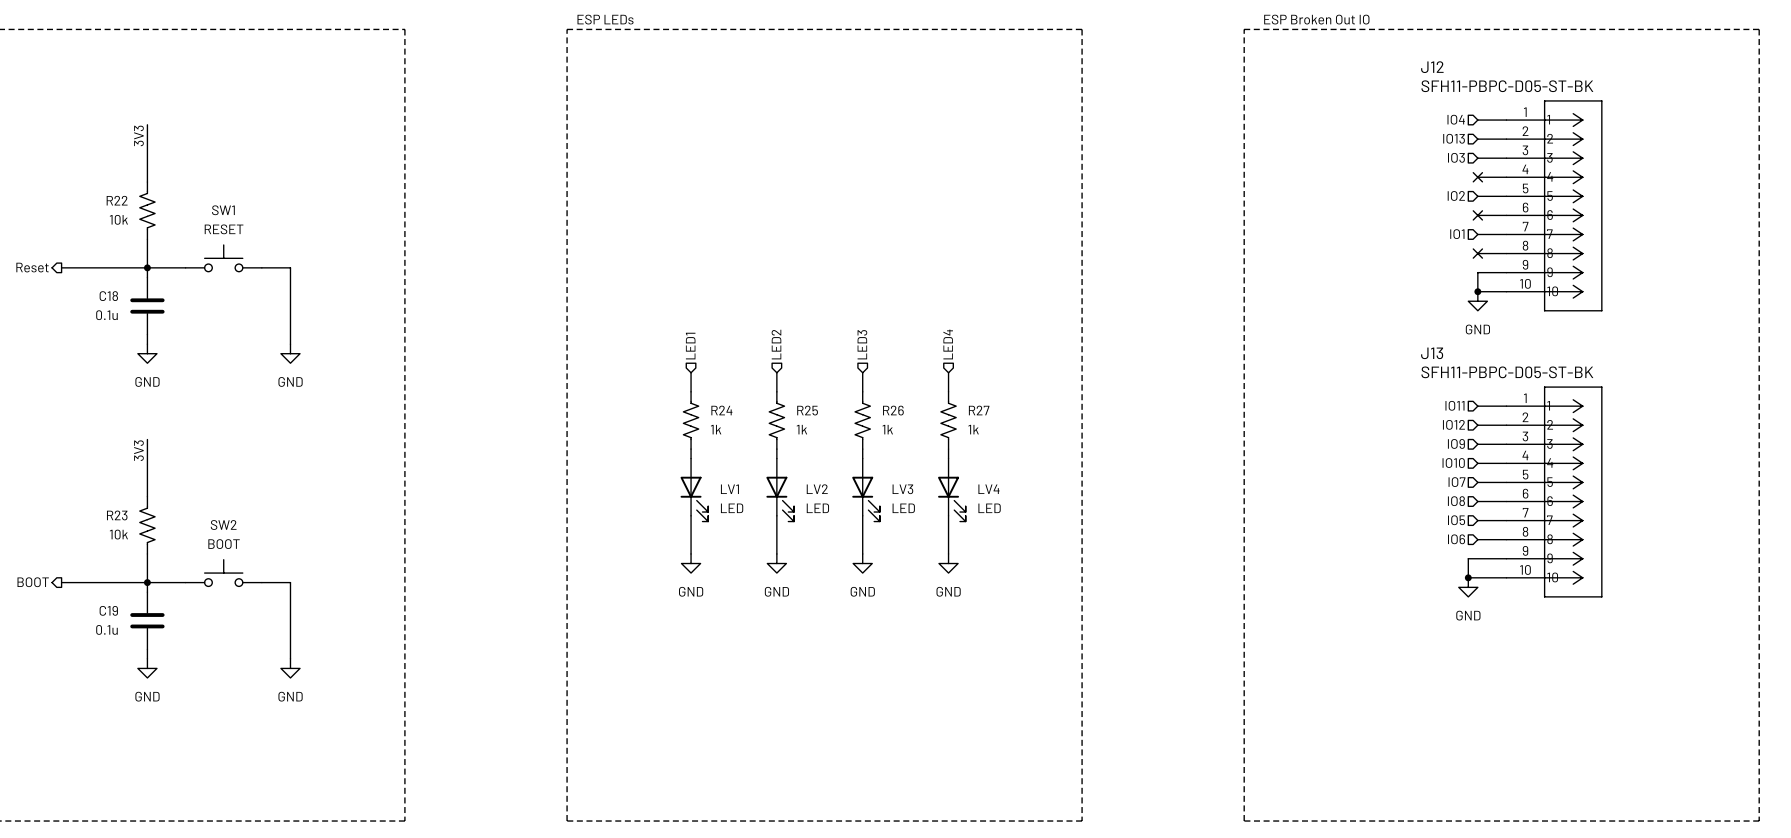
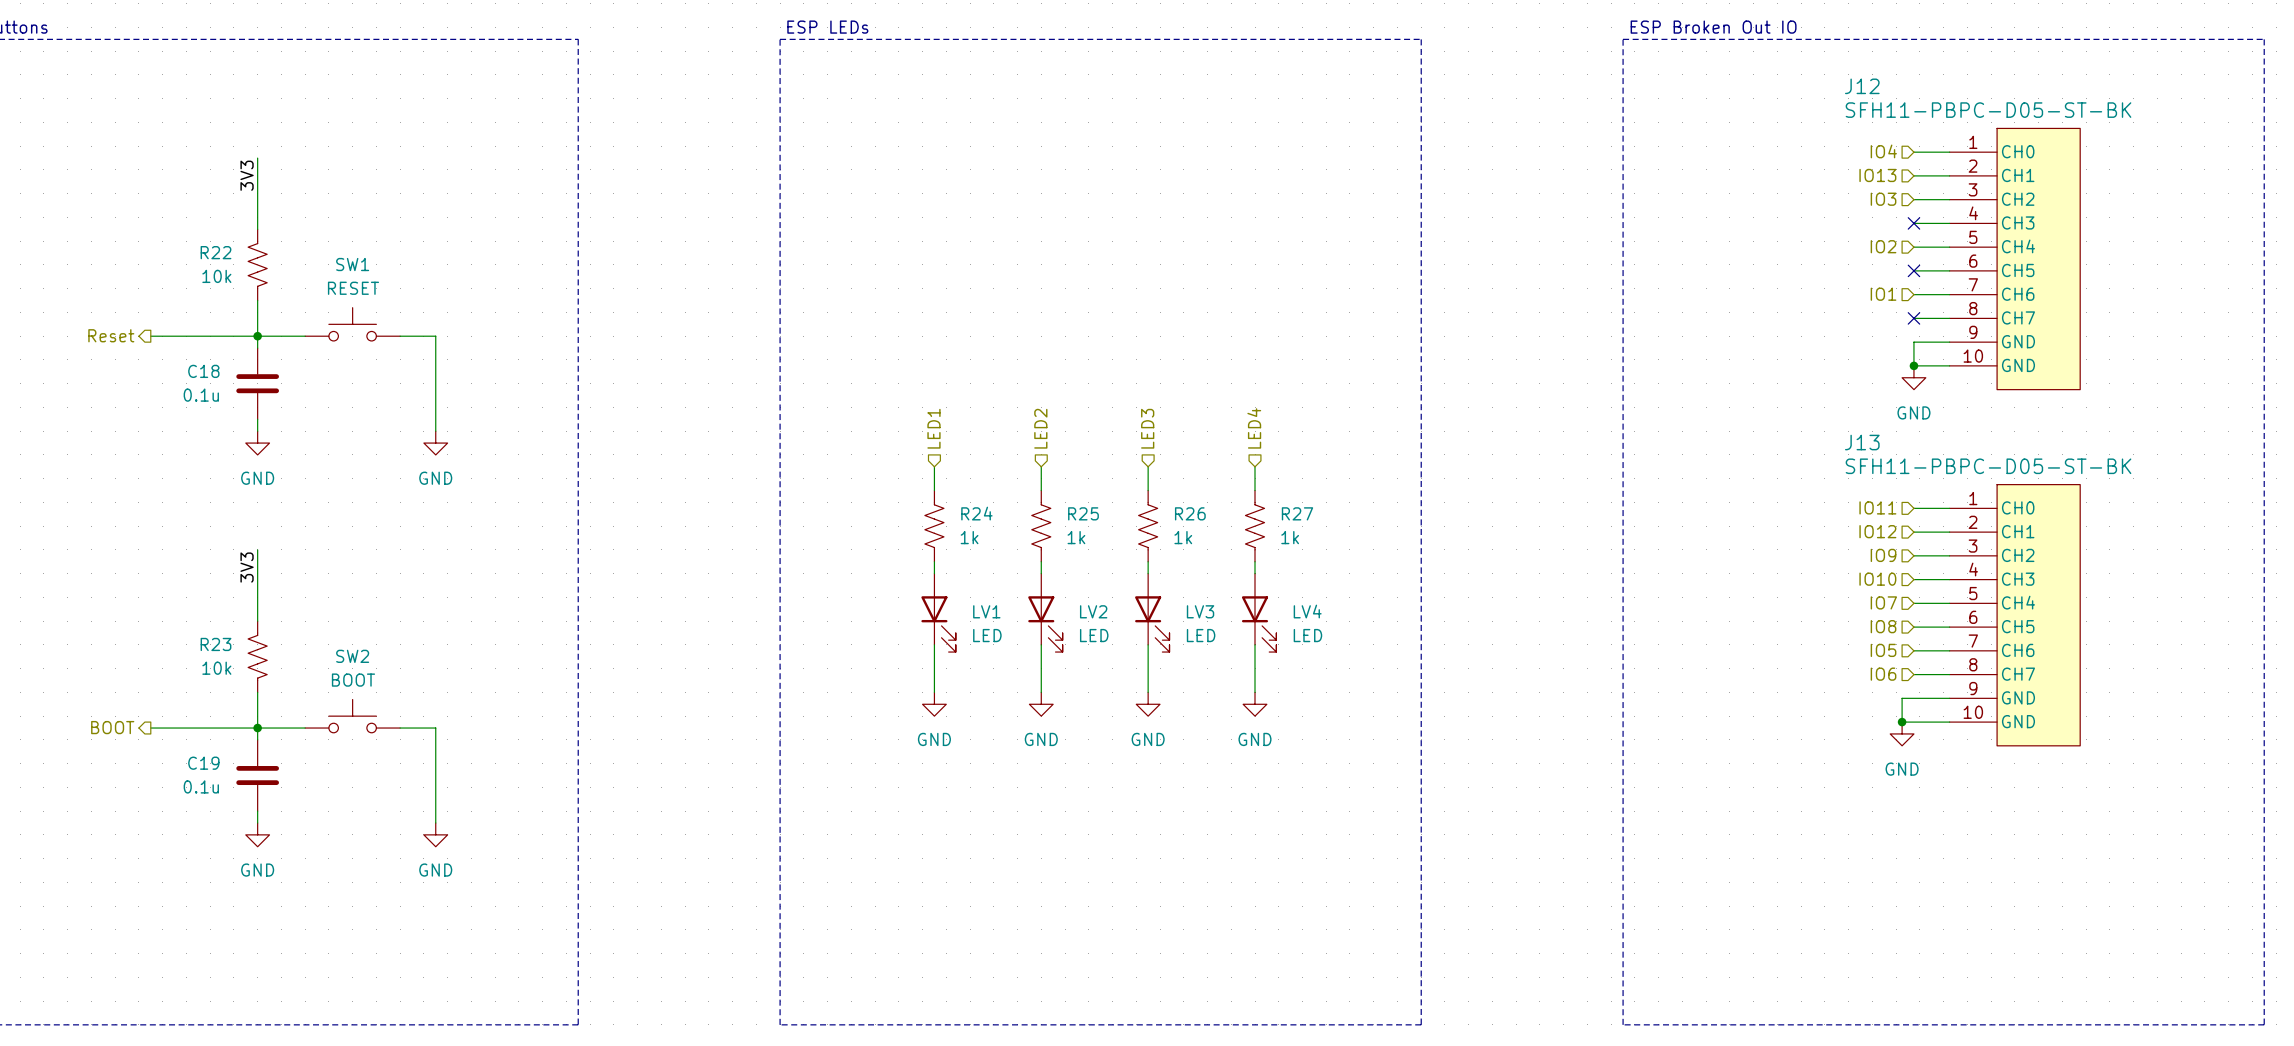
J12 symbol: [1506, 100, 1603, 312] -> [1949, 128, 2081, 390]
J13 symbol: [1506, 386, 1603, 598] -> [1949, 484, 2081, 746]

